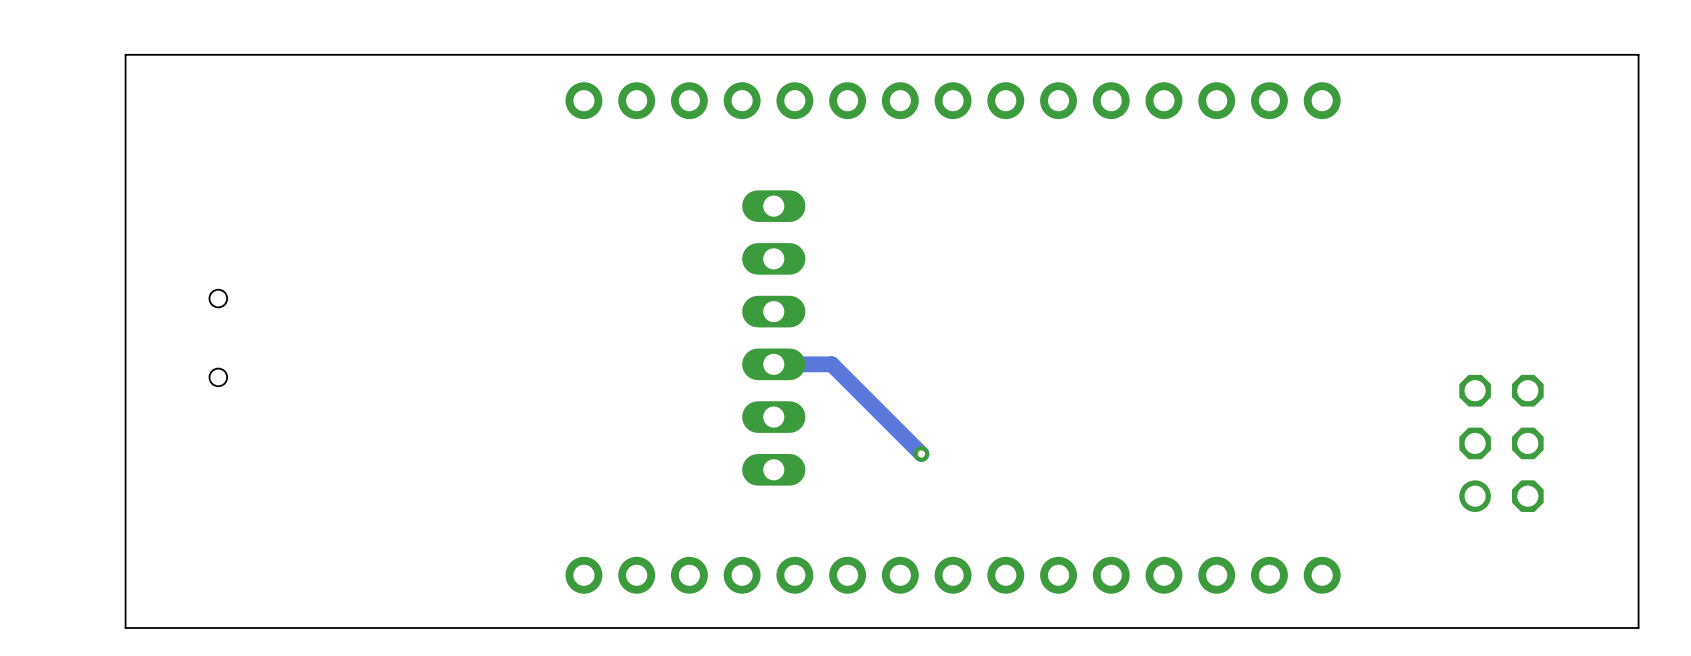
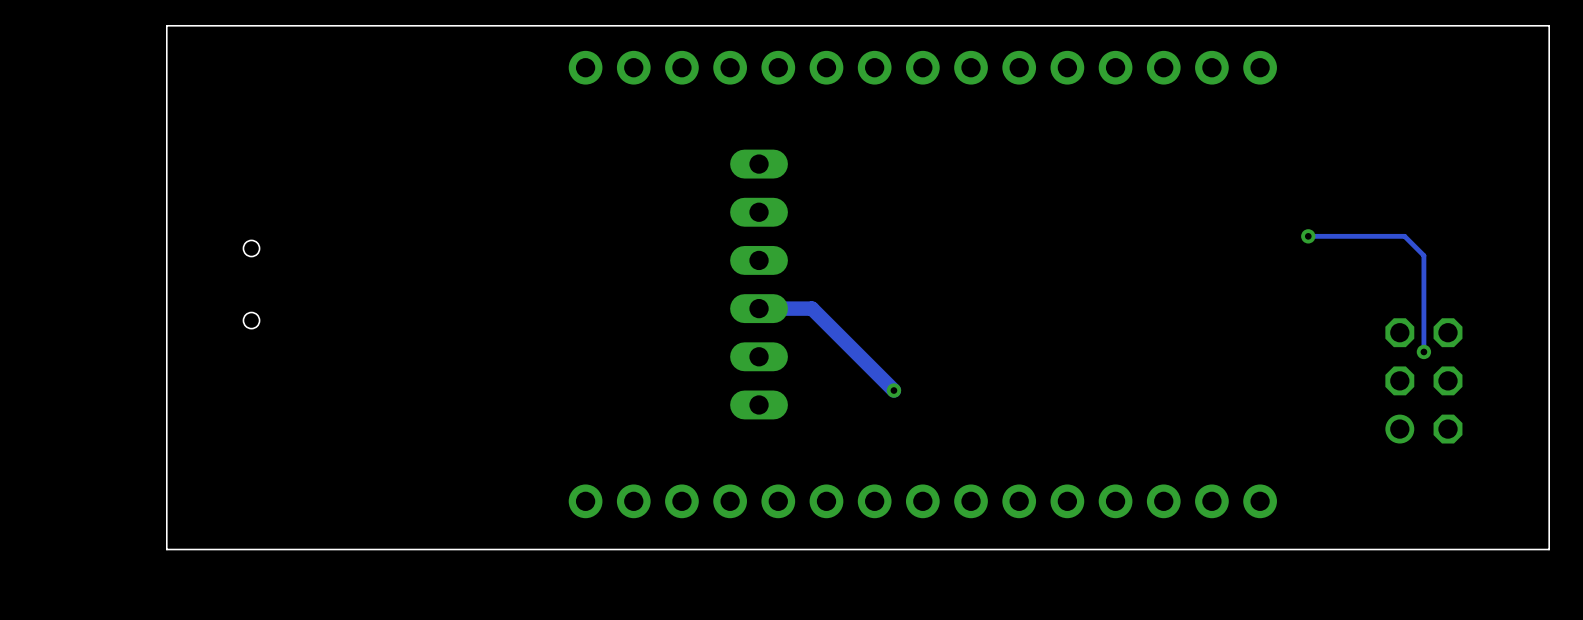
track: none -> (1308, 236) (1404, 236) (1423, 255) (1423, 351)
via: none -> (1308, 236)
via: none -> (1423, 351)

